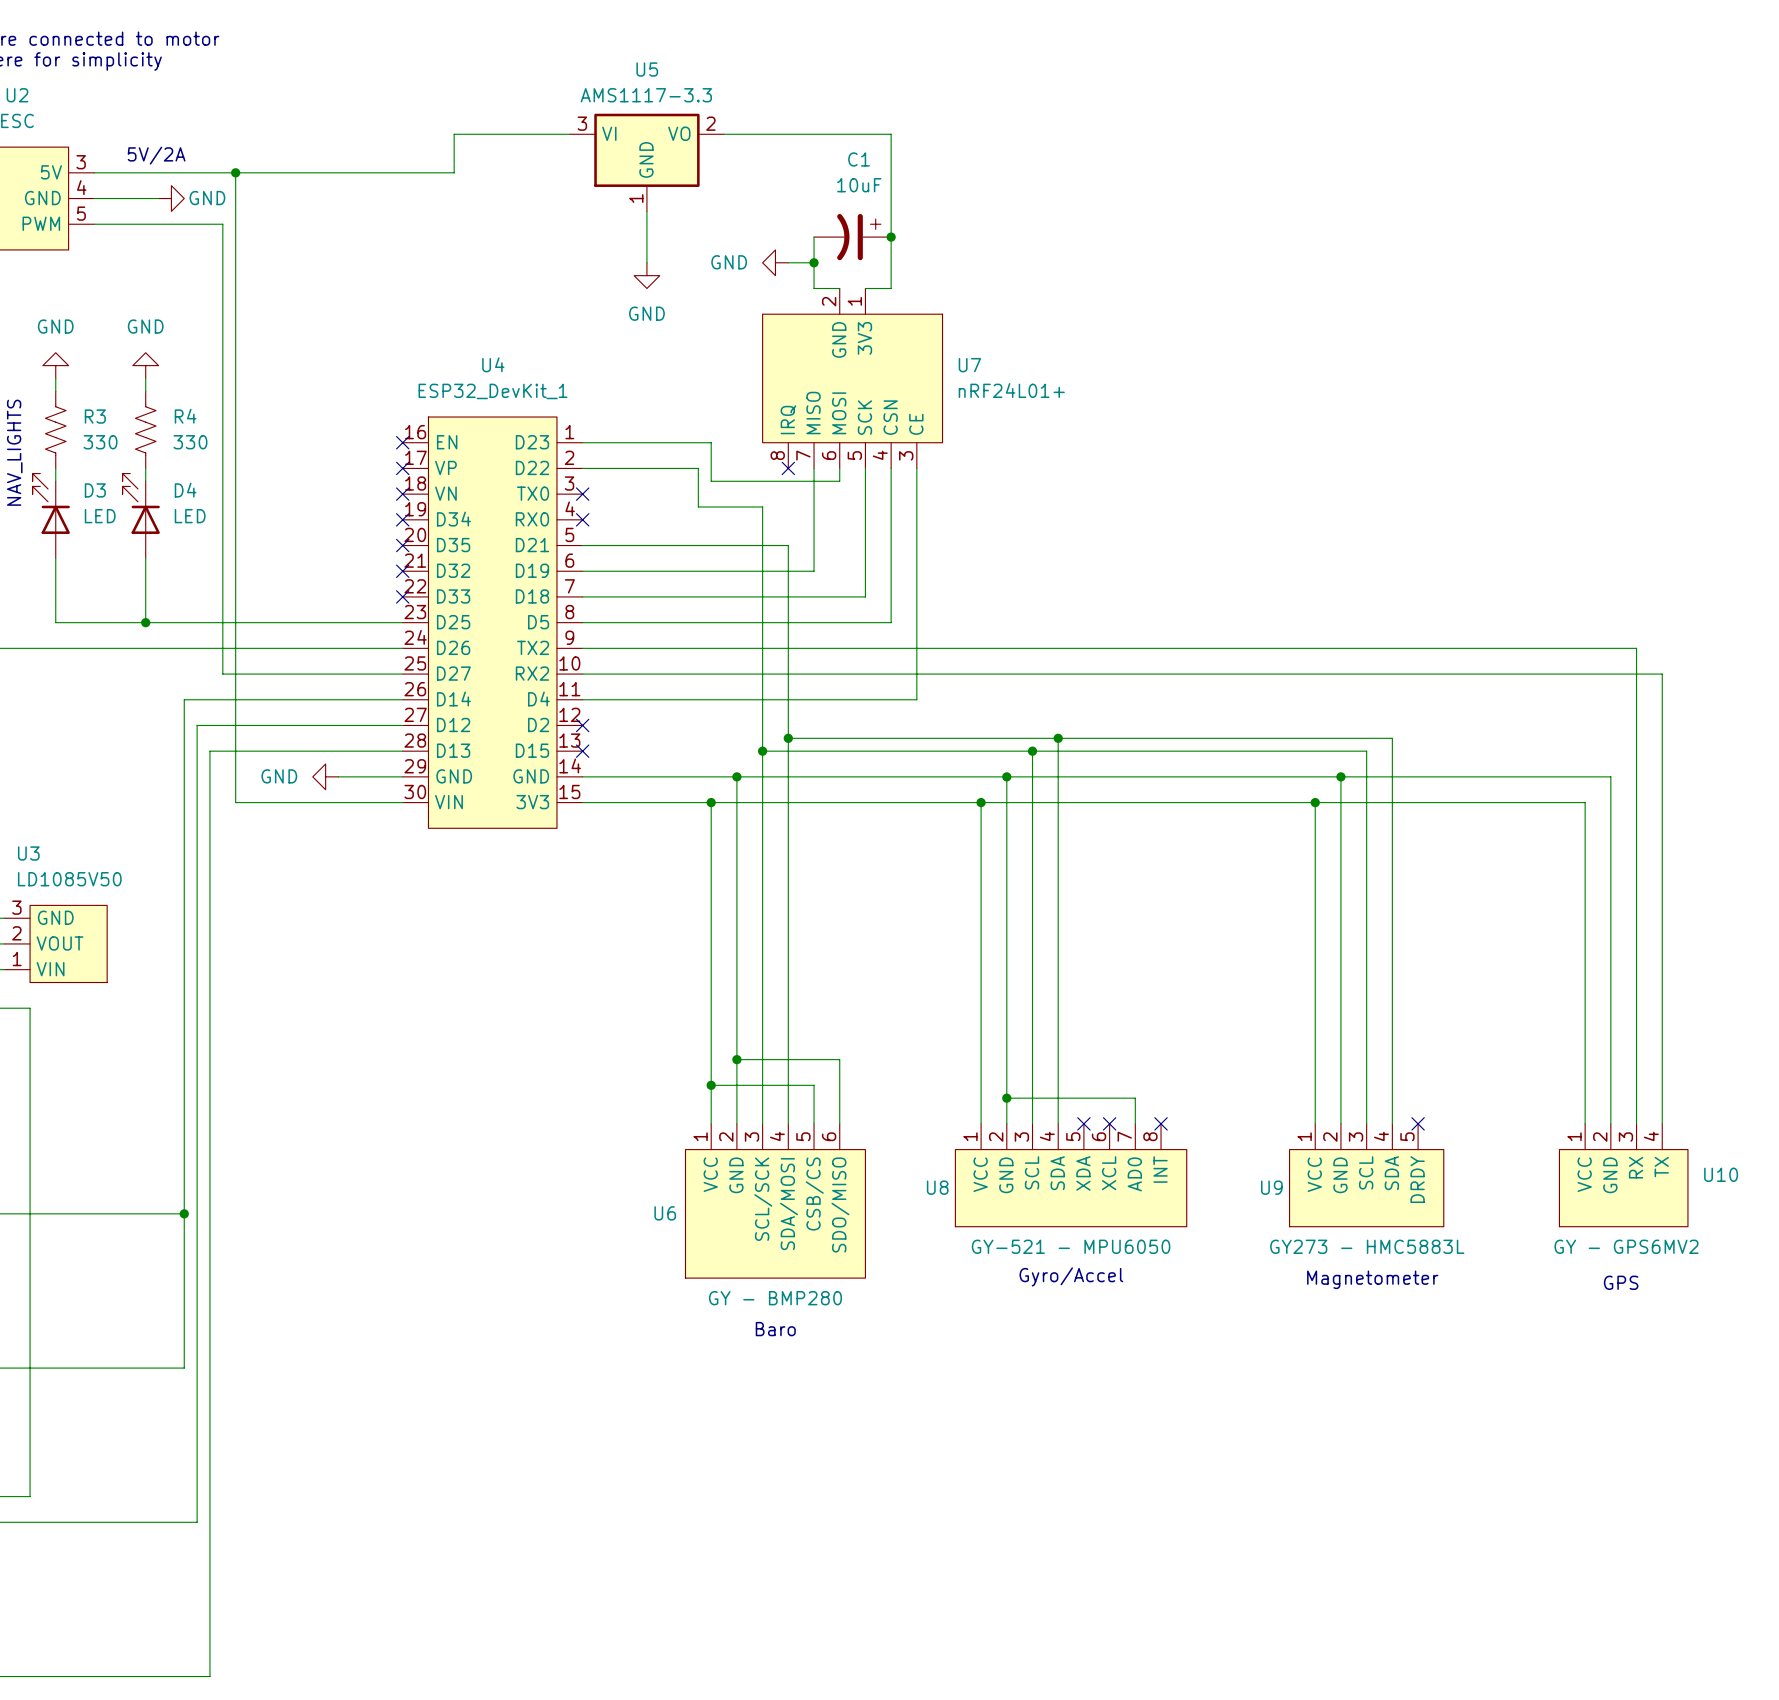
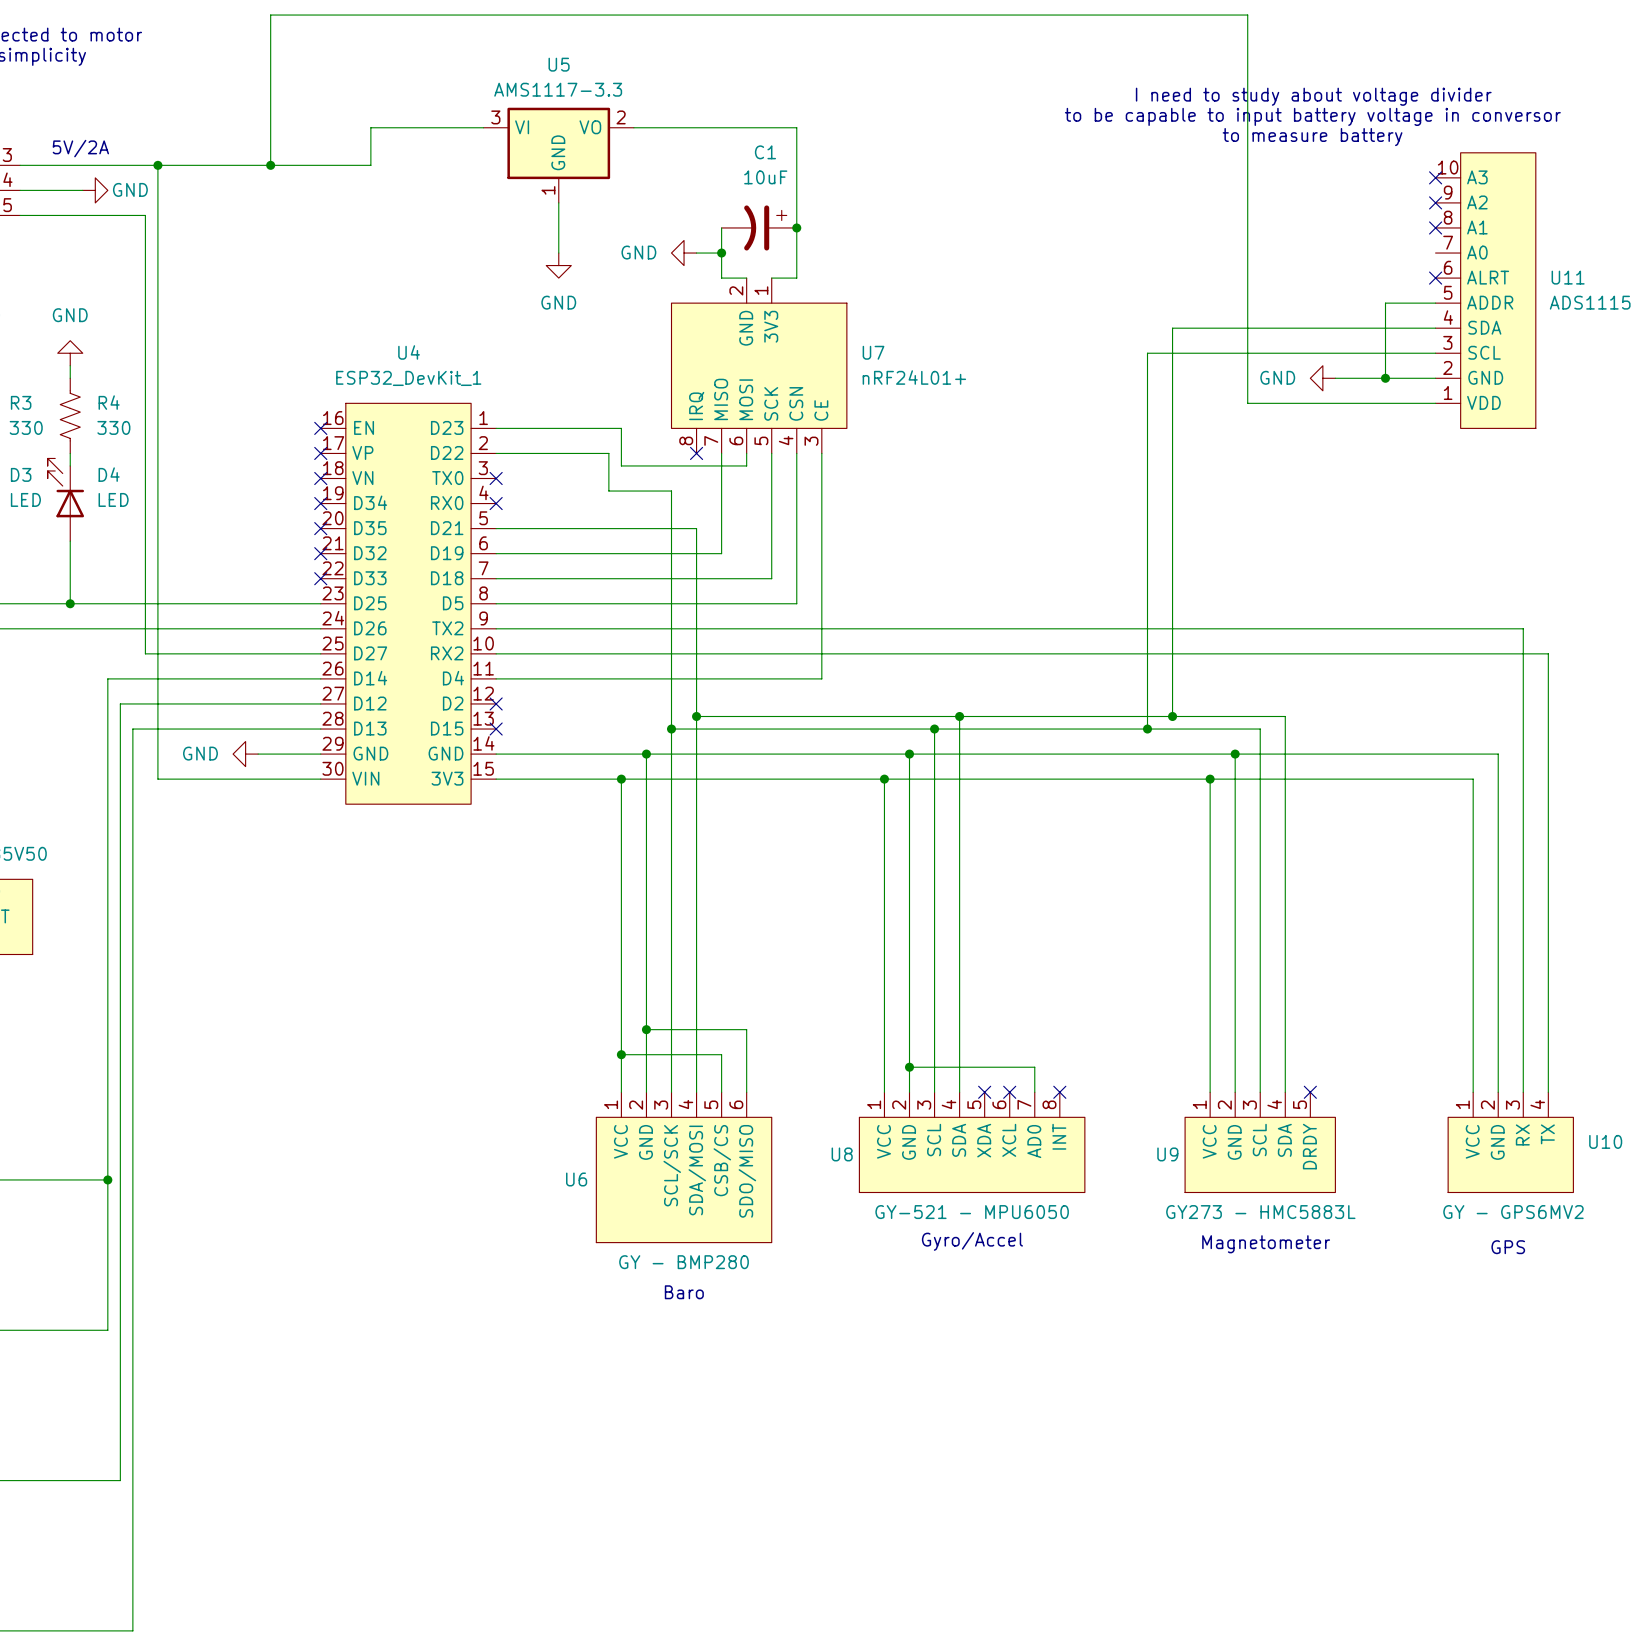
text: none -> I need to study about voltage divider (1313, 96)
text: none -> to be capable to input battery voltage in conversor (1312, 116)
text: none -> to measure battery (1312, 137)
wire: none -> (270, 165) (270, 15) (1247, 15) (1247, 403) (1435, 403)
junction: none -> (270, 165)
no-connect mark: none -> (1435, 177)
no-connect mark: none -> (1435, 202)
no-connect mark: none -> (1435, 227)
no-connect mark: none -> (1435, 278)
U11: none -> ADS1115 (1485, 290)
wire: none -> (1435, 303) (1385, 303) (1385, 378)
wire: none -> (1435, 328) (1172, 328) (1172, 716)
wire: none -> (1435, 353) (1147, 353) (1147, 729)
power symbol: none -> GND (1322, 378)
wire: none -> (1335, 378) (1435, 378)
junction: none -> (1385, 378)
junction: none -> (1172, 716)
junction: none -> (1147, 729)

